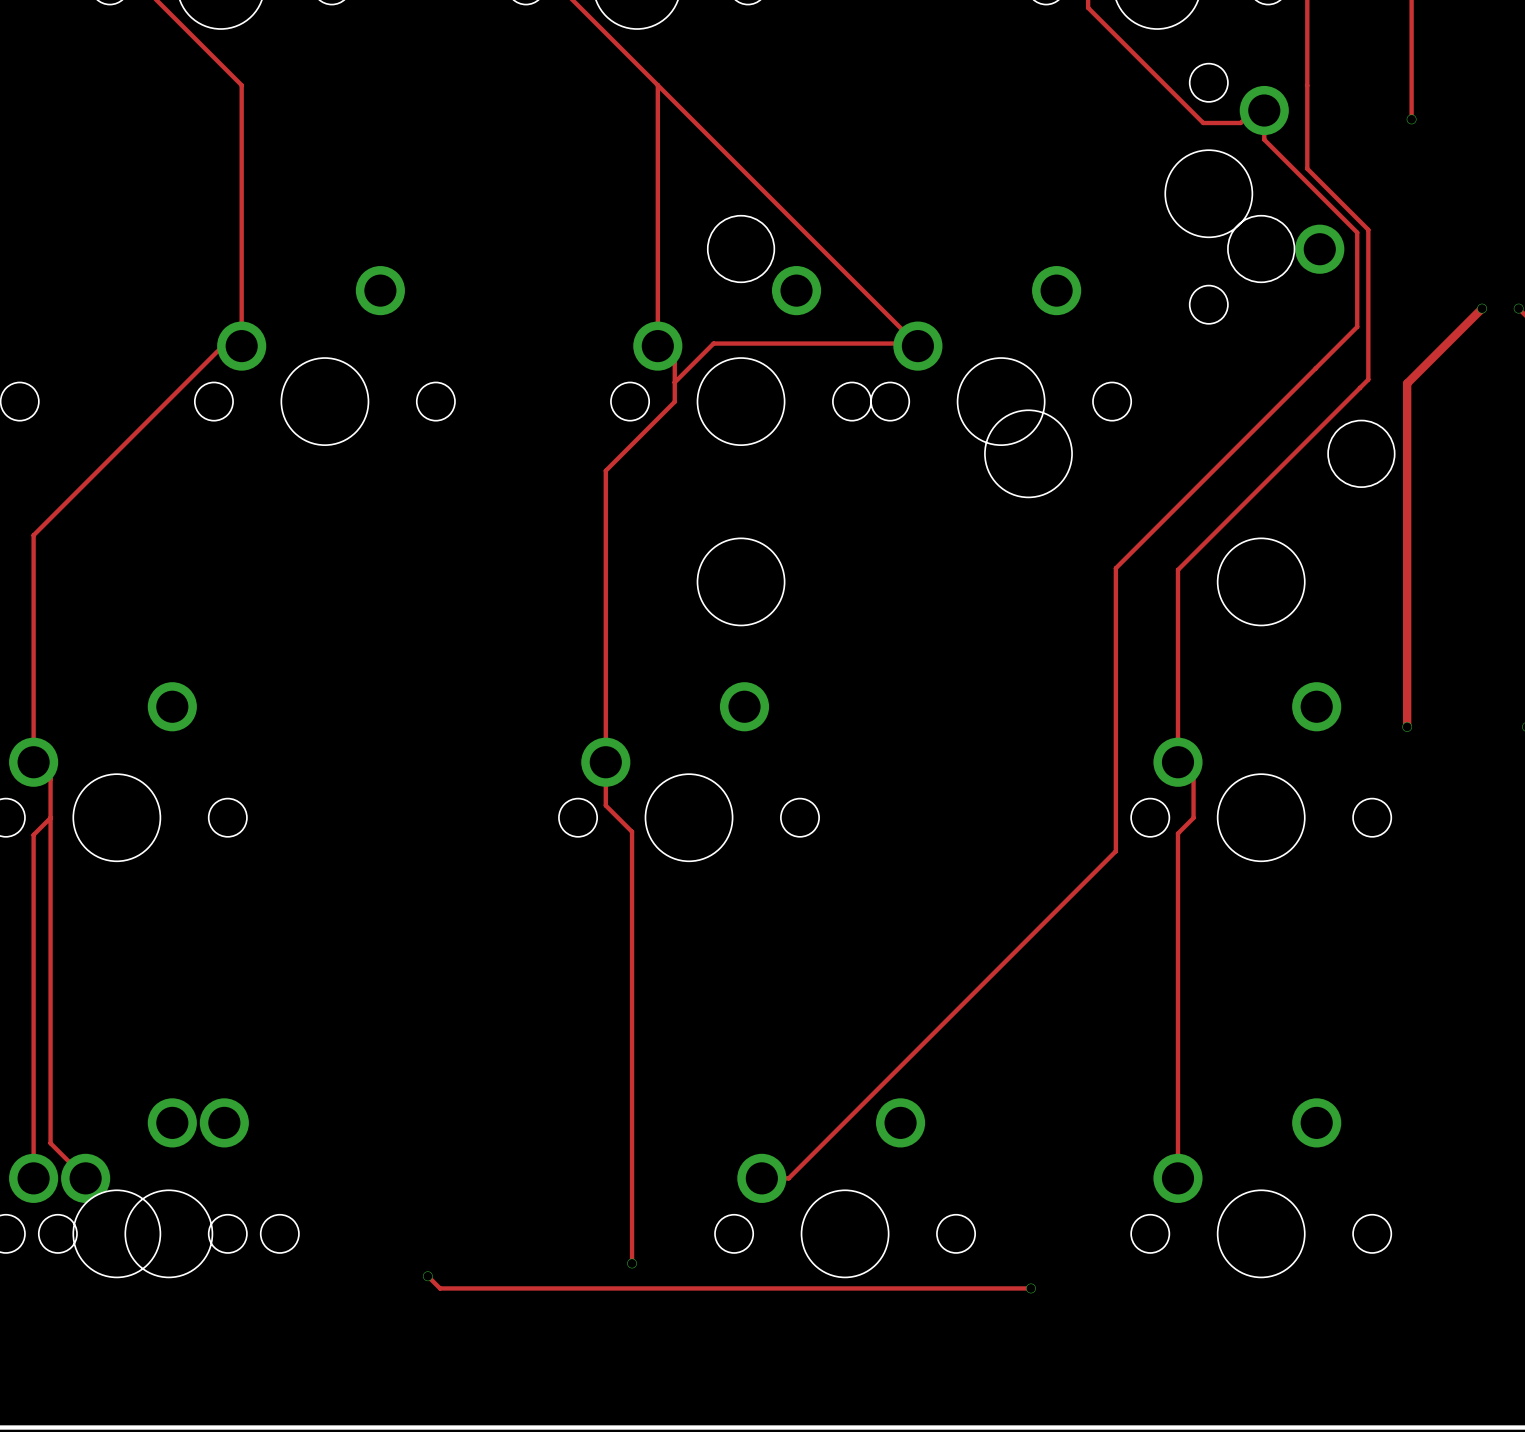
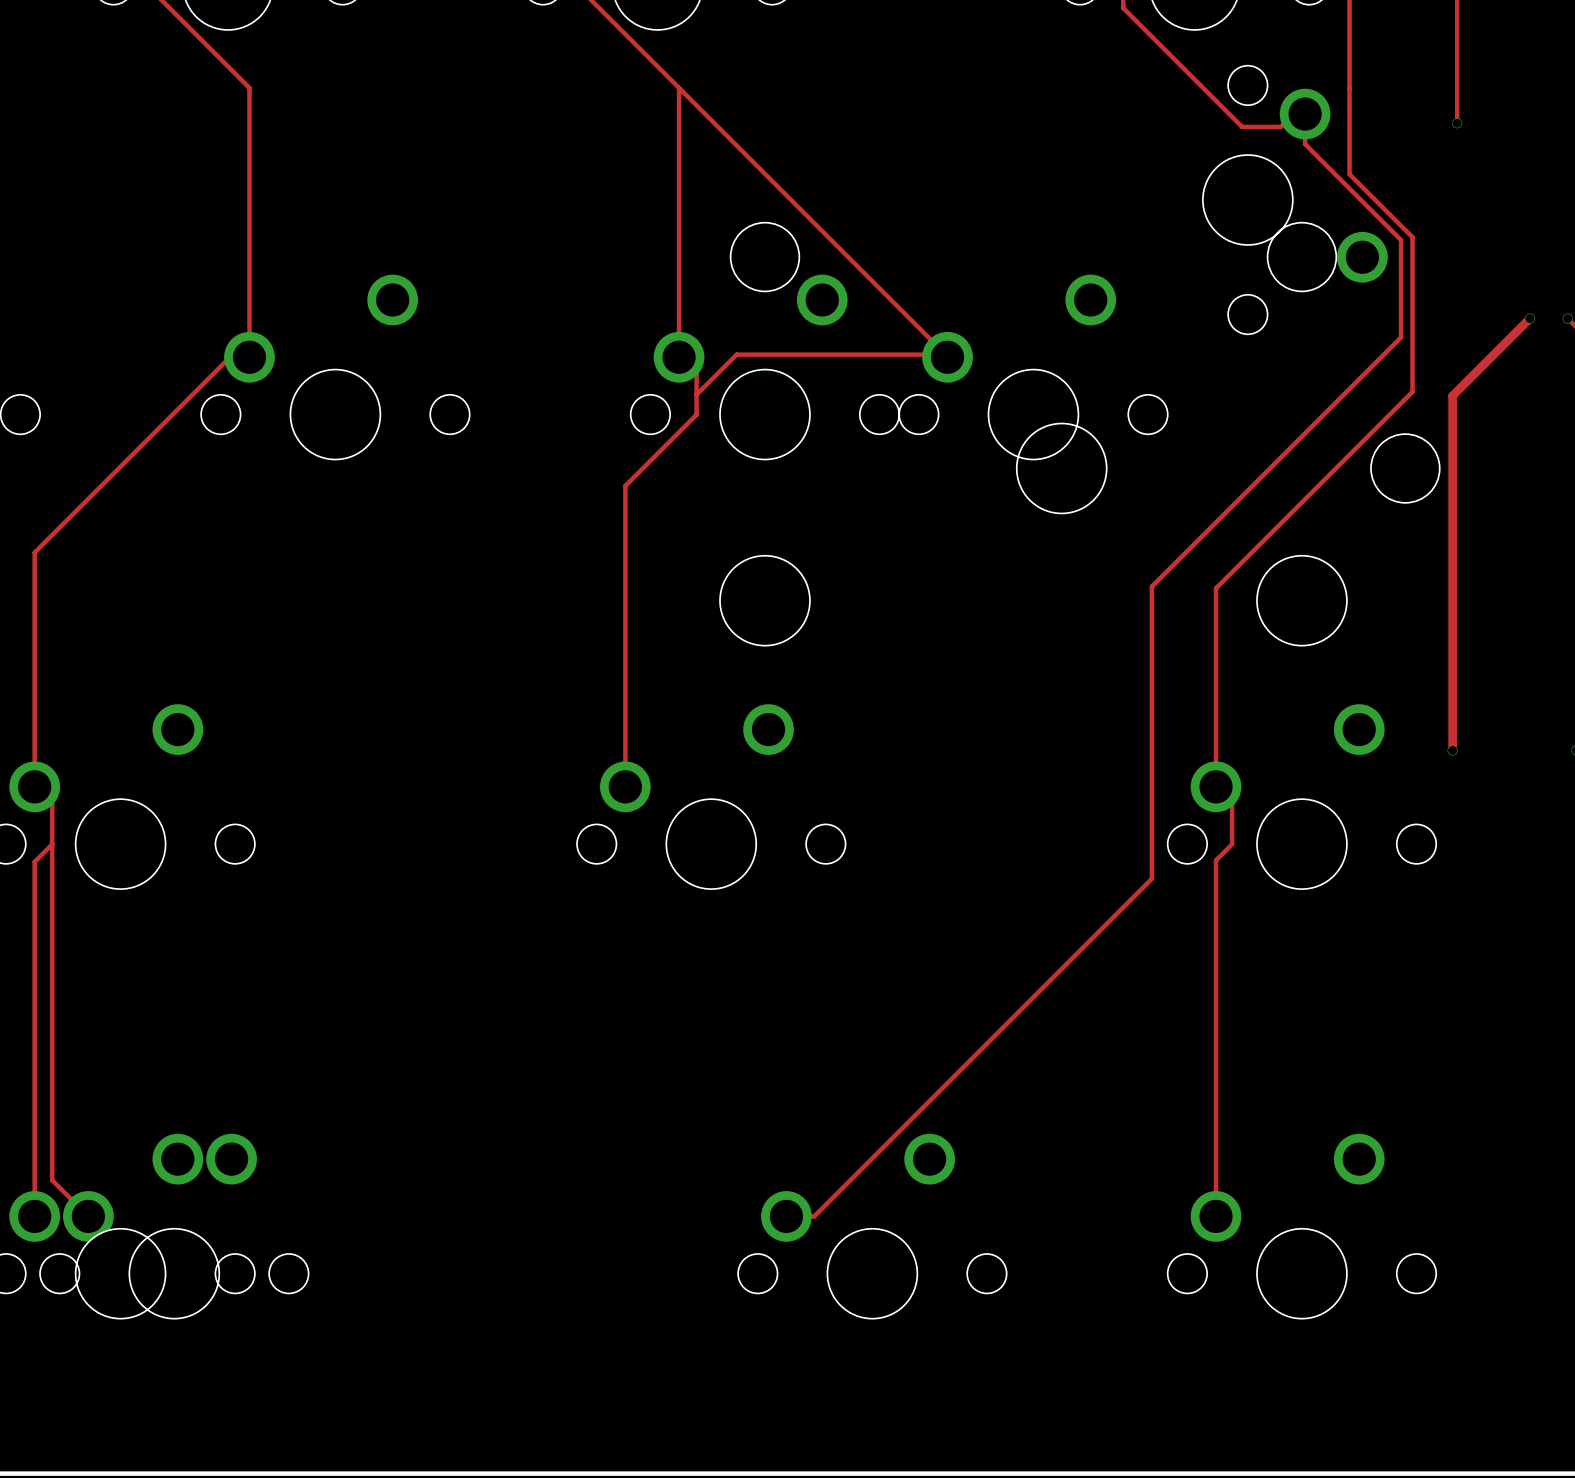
track: (605, 762) (605, 805) (632, 831) (632, 1263) -> none
via: (632, 1263) -> none
track: (427, 1276) (440, 1288) (1030, 1288) -> none
via: (427, 1276) -> none
via: (1030, 1288) -> none

